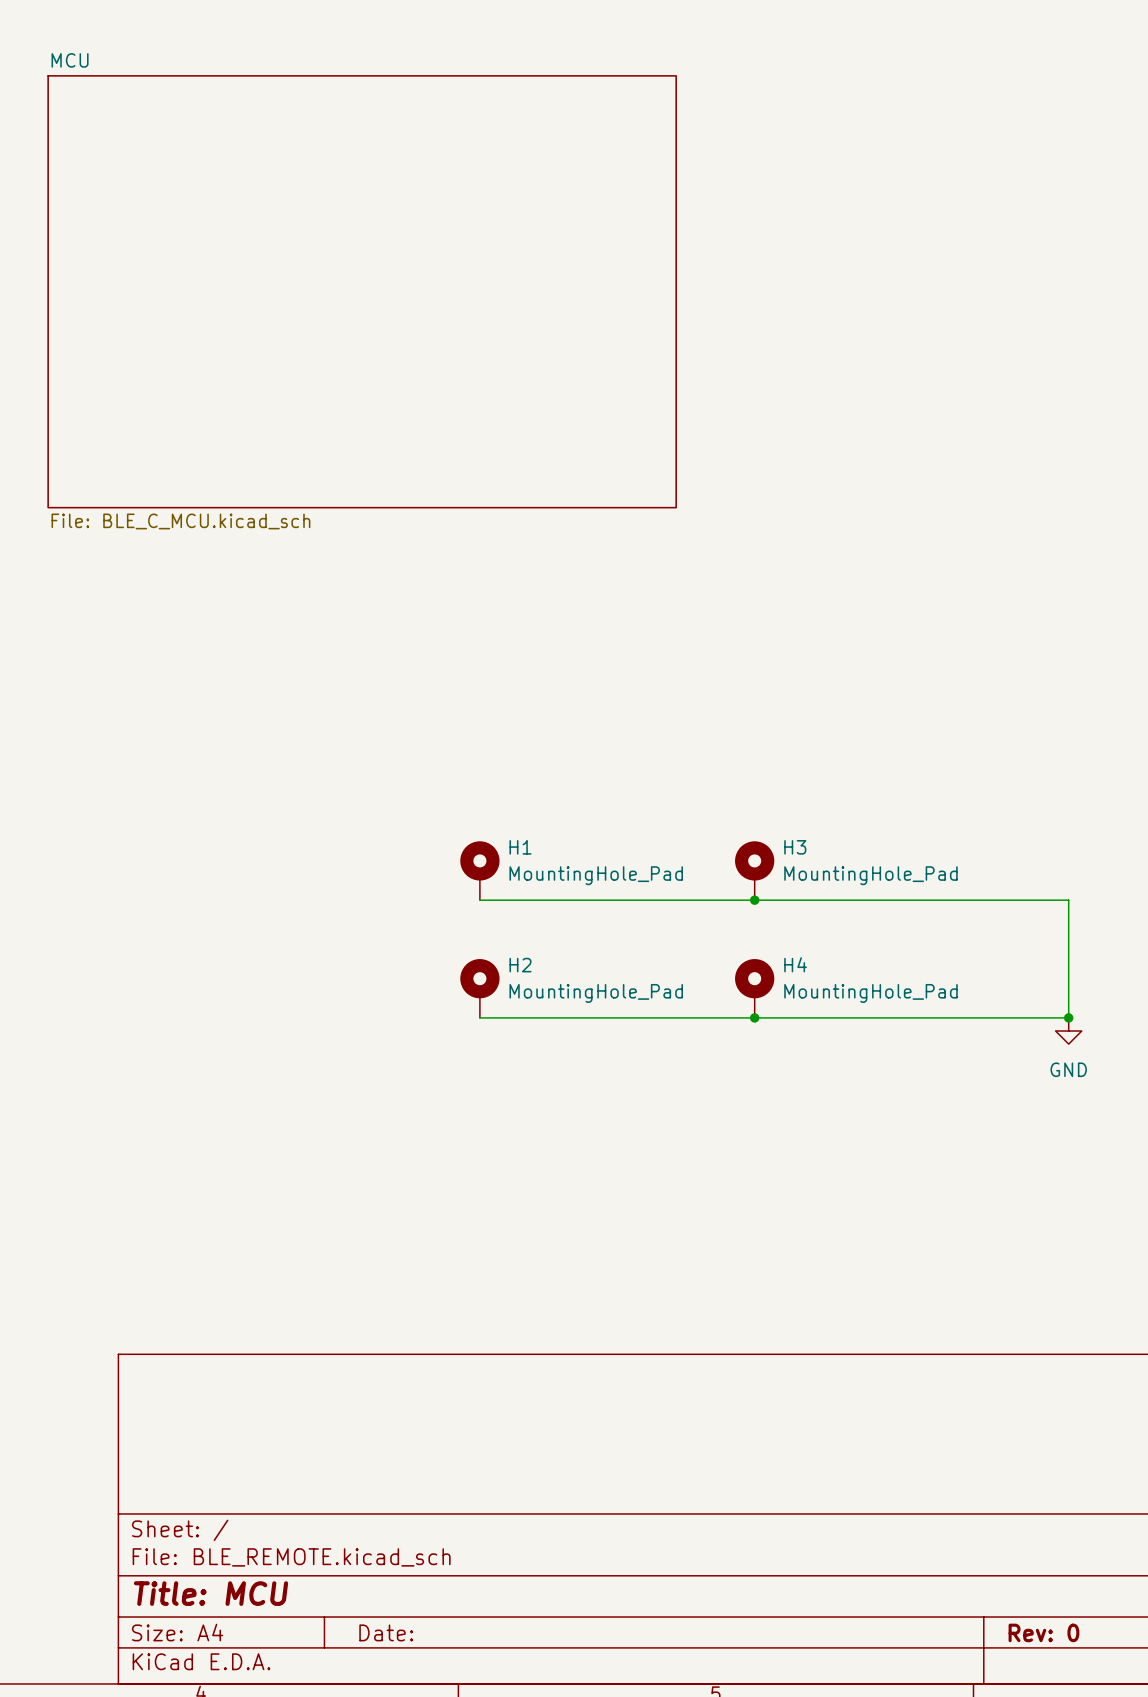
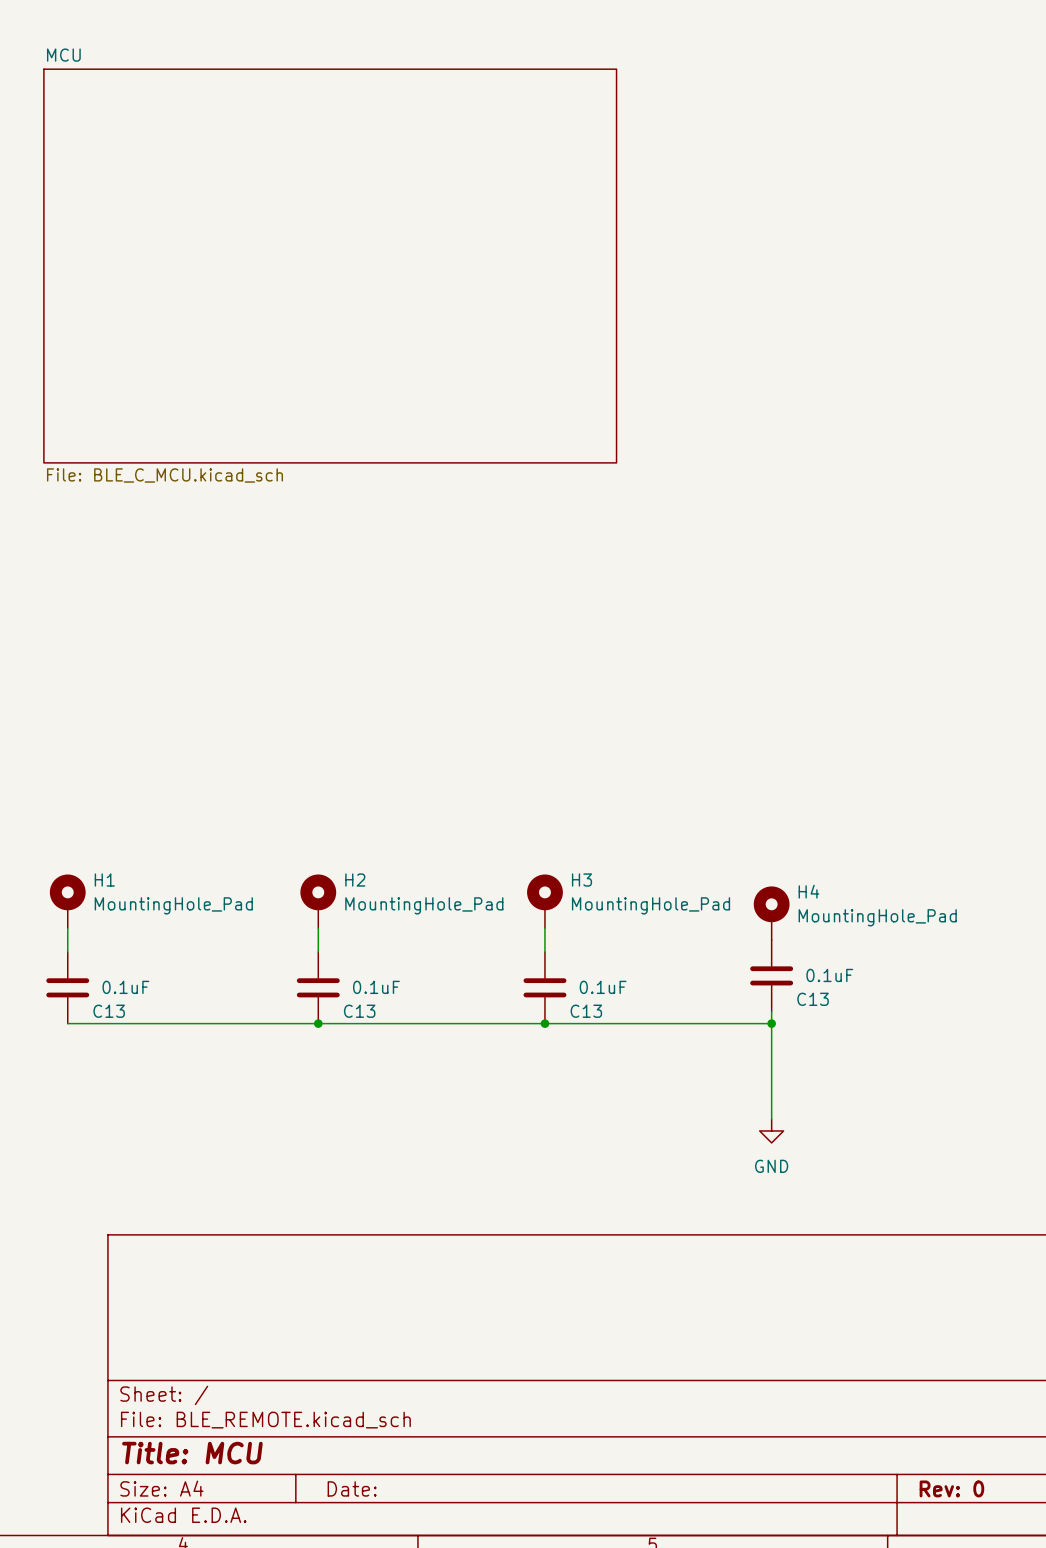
H1 position: (479, 870) -> (67, 901)
H3 position: (754, 870) -> (544, 901)
wire: (479, 900) (1068, 900) (1068, 1017) (479, 1017) -> none
junction: (754, 900) -> none
H2 position: (479, 988) -> (318, 901)
H4 position: (754, 988) -> (771, 913)
wire: none -> (67, 928) (67, 952)
wire: none -> (318, 928) (318, 952)
wire: none -> (544, 928) (544, 952)
junction: (754, 1017) -> none
junction: (1068, 1017) -> none
power symbol: GND (1068, 1031) -> none
C13: none -> 0.1uF (771, 975)
C13: none -> 0.1uF (67, 987)
C13: none -> 0.1uF (318, 987)
C13: none -> 0.1uF (544, 987)
wire: none -> (771, 1011) (771, 1119)
wire: none -> (67, 1023) (771, 1023)
junction: none -> (318, 1023)
junction: none -> (544, 1023)
junction: none -> (771, 1023)
power symbol: none -> GND (771, 1130)

